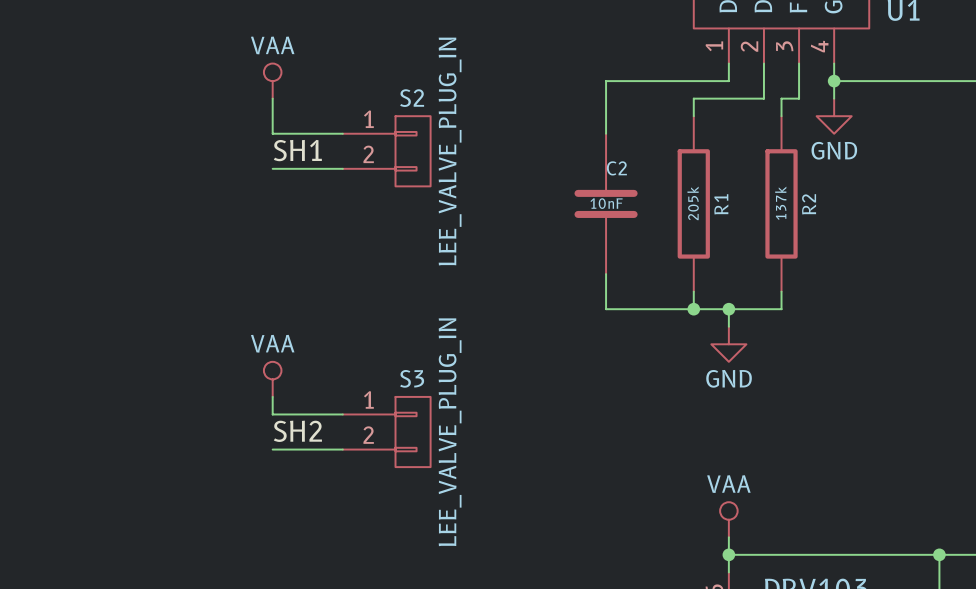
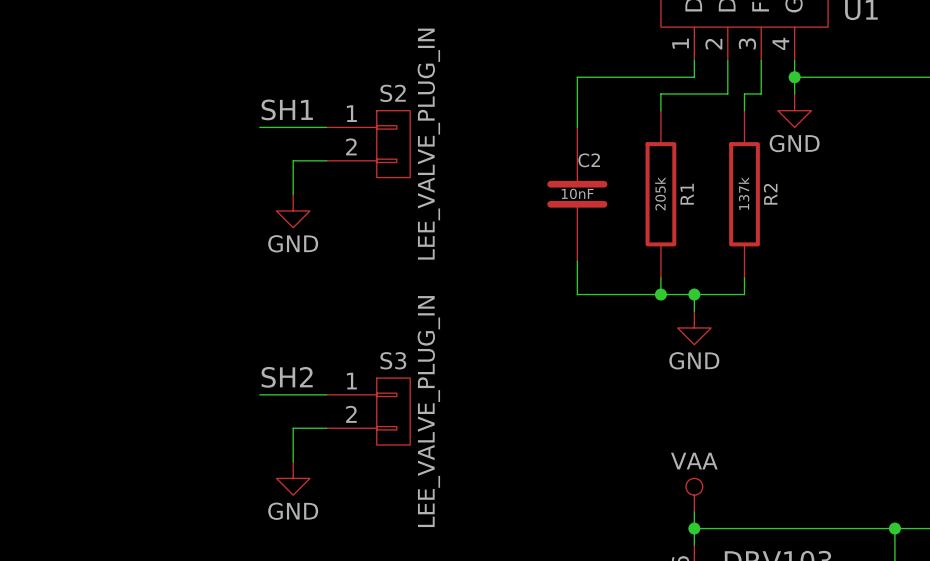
power symbol: VAA (272, 81) -> none
wire: (272, 98) (272, 133) -> none
label position: SH1 (297, 150) -> SH1 (287, 109)
wire: (272, 168) (307, 168) -> (293, 194) (293, 160)
power symbol: none -> GND (293, 210)
power symbol: VAA (272, 379) -> none
wire: (272, 396) (272, 414) -> none
label position: SH2 (297, 431) -> SH2 (287, 377)
wire: (272, 449) (307, 449) -> (293, 461) (293, 428)
power symbol: none -> GND (293, 478)

